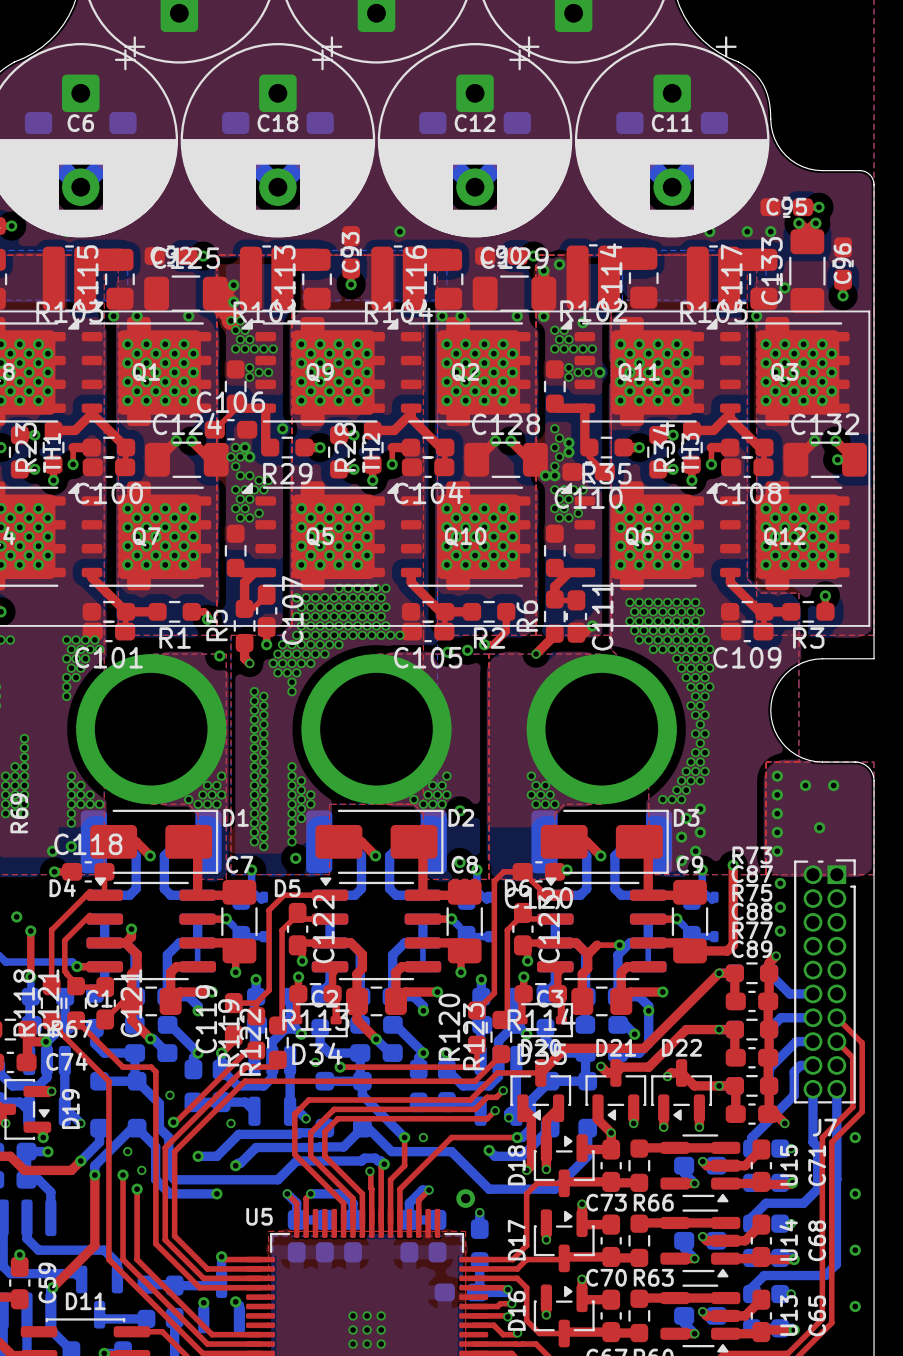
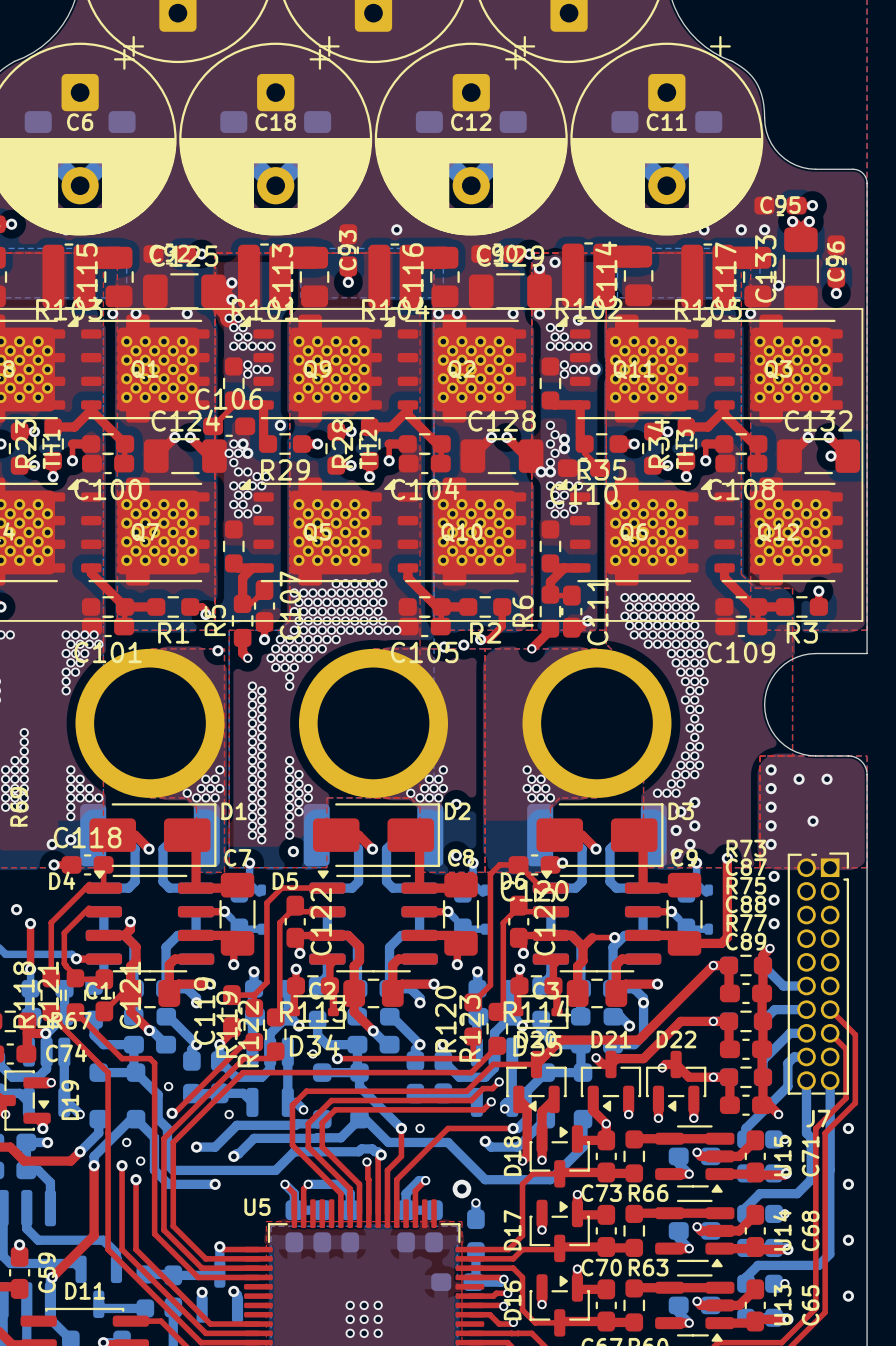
bottom track: (197, 942) (197, 966) -> none
bottom track: (422, 942) (422, 966) -> none
bottom track: (648, 942) (648, 966) -> none

